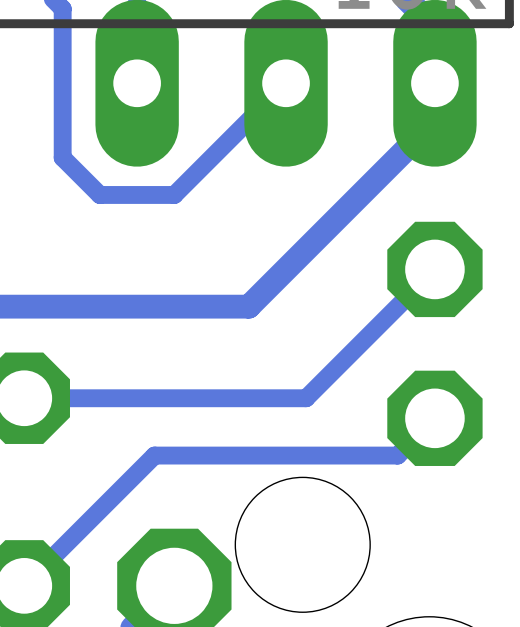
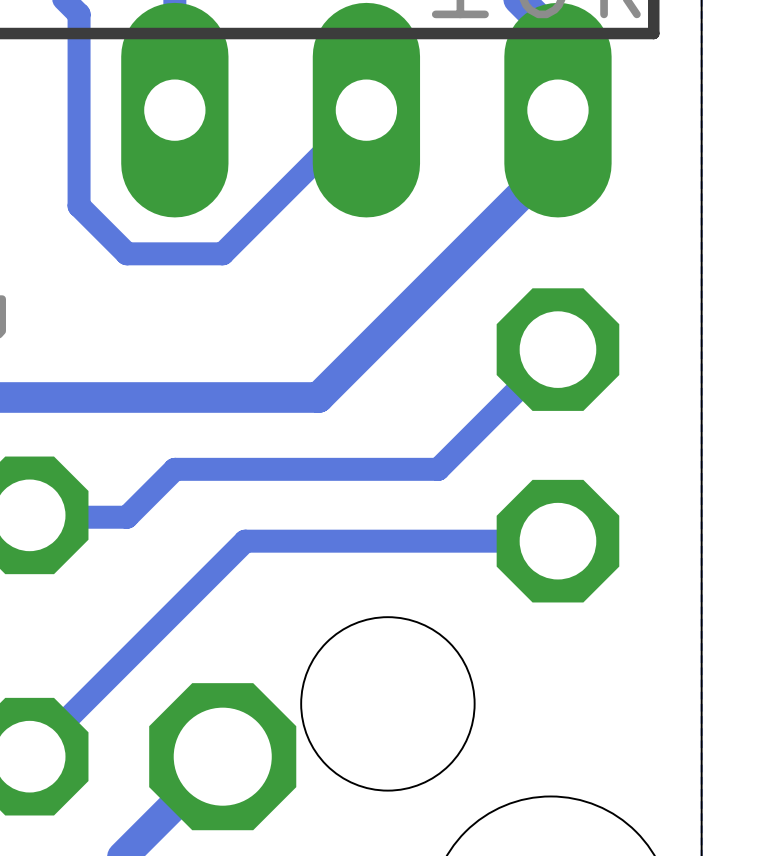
track: (341, 362) (306, 398) (24, 398) -> (438, 469) (174, 469) (126, 517) (31, 517) (29, 515)
track: (434, 418) (397, 455) (154, 455) -> (557, 541) (245, 541) (197, 589)

